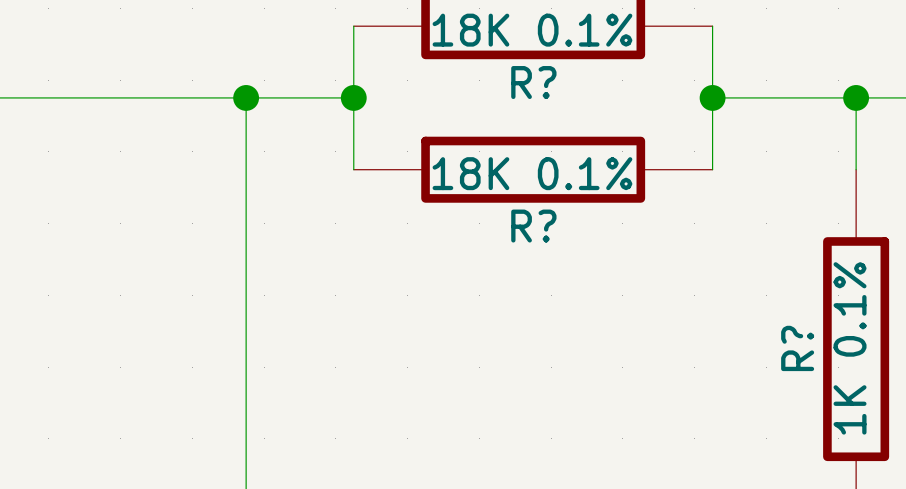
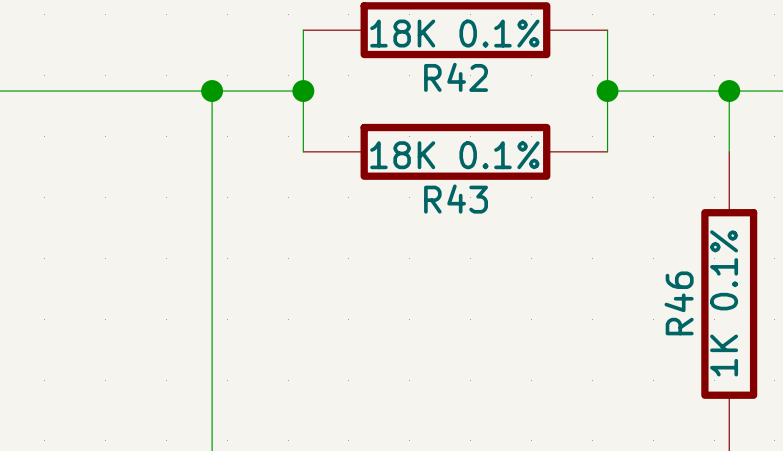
R? name: R? (533, 82) -> R42 (456, 77)
R? name: R? (533, 226) -> R43 (456, 199)
R? name: R? (797, 348) -> R46 (679, 303)

